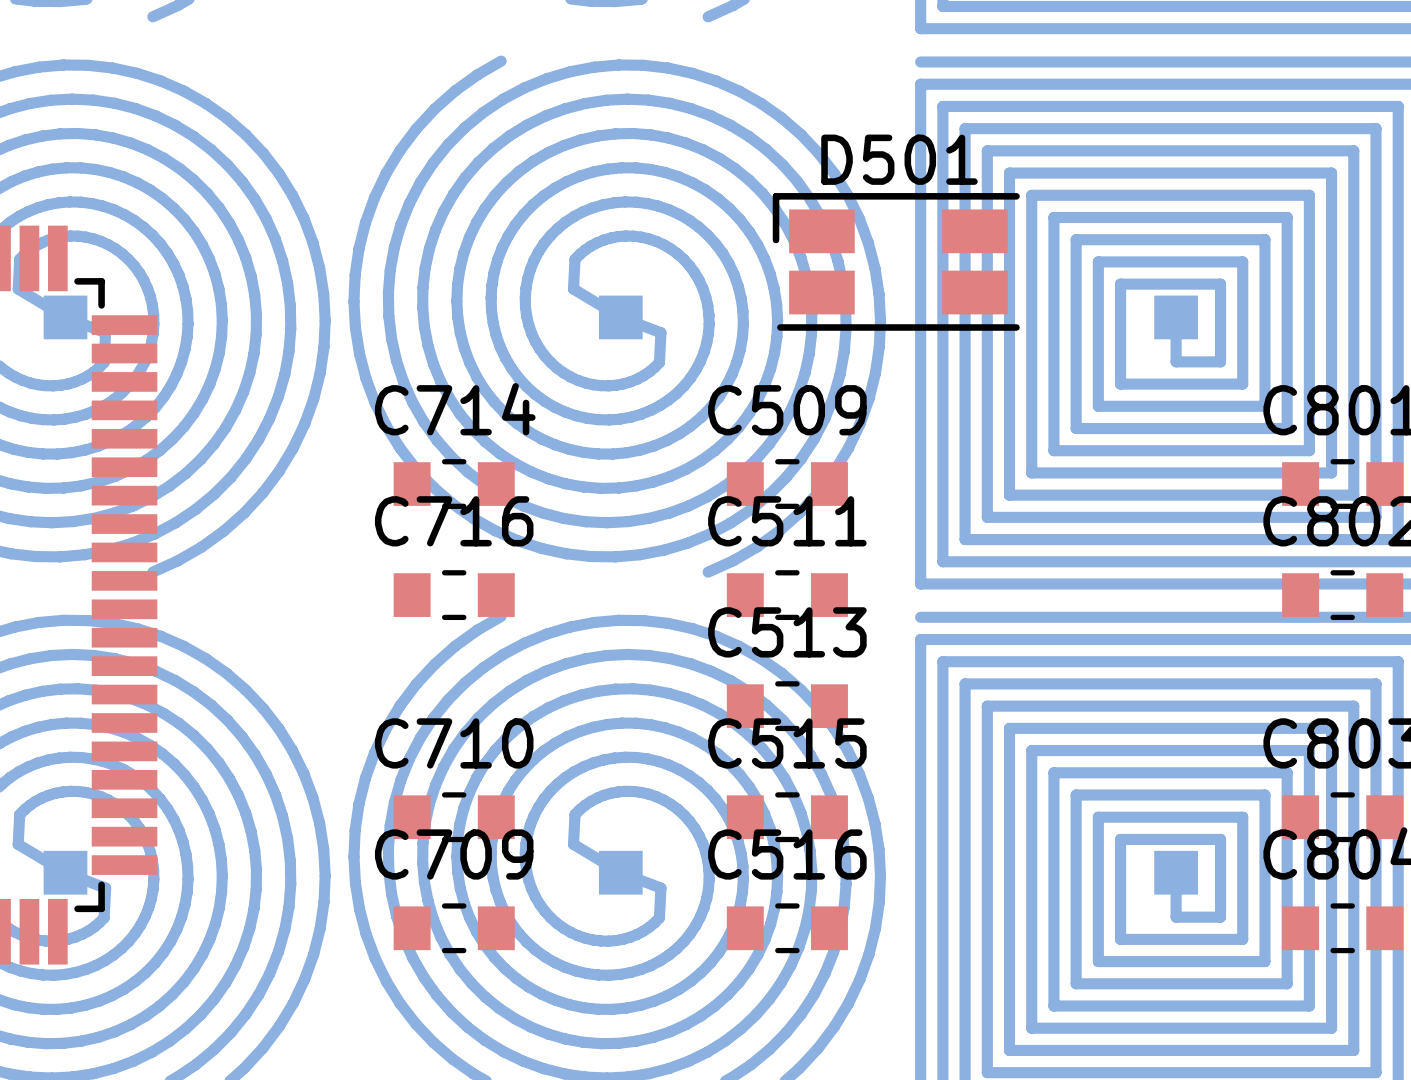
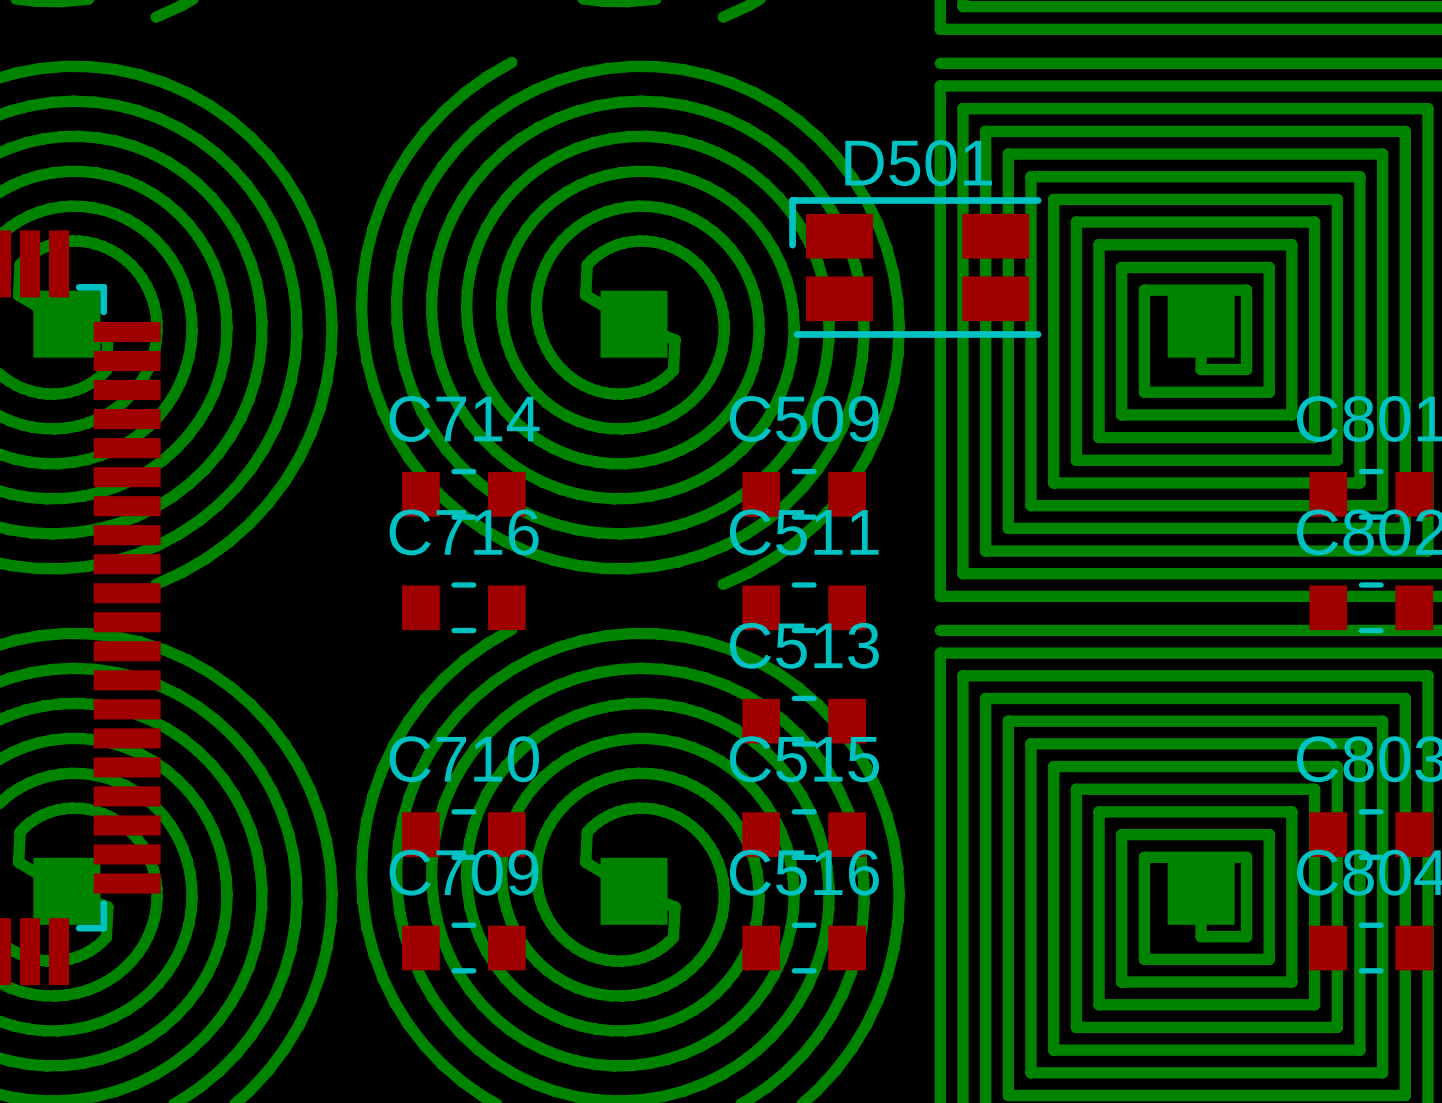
part footprint: [43, 295, 88, 340] -> [33, 290, 101, 358]
part footprint: [598, 295, 643, 340] -> [600, 290, 668, 358]
part footprint: [1154, 295, 1198, 340] -> [1167, 290, 1235, 358]
part footprint: [43, 850, 88, 895] -> [33, 857, 101, 925]
part footprint: [598, 850, 643, 895] -> [600, 857, 668, 925]
part footprint: [1154, 850, 1198, 895] -> [1167, 857, 1235, 925]

